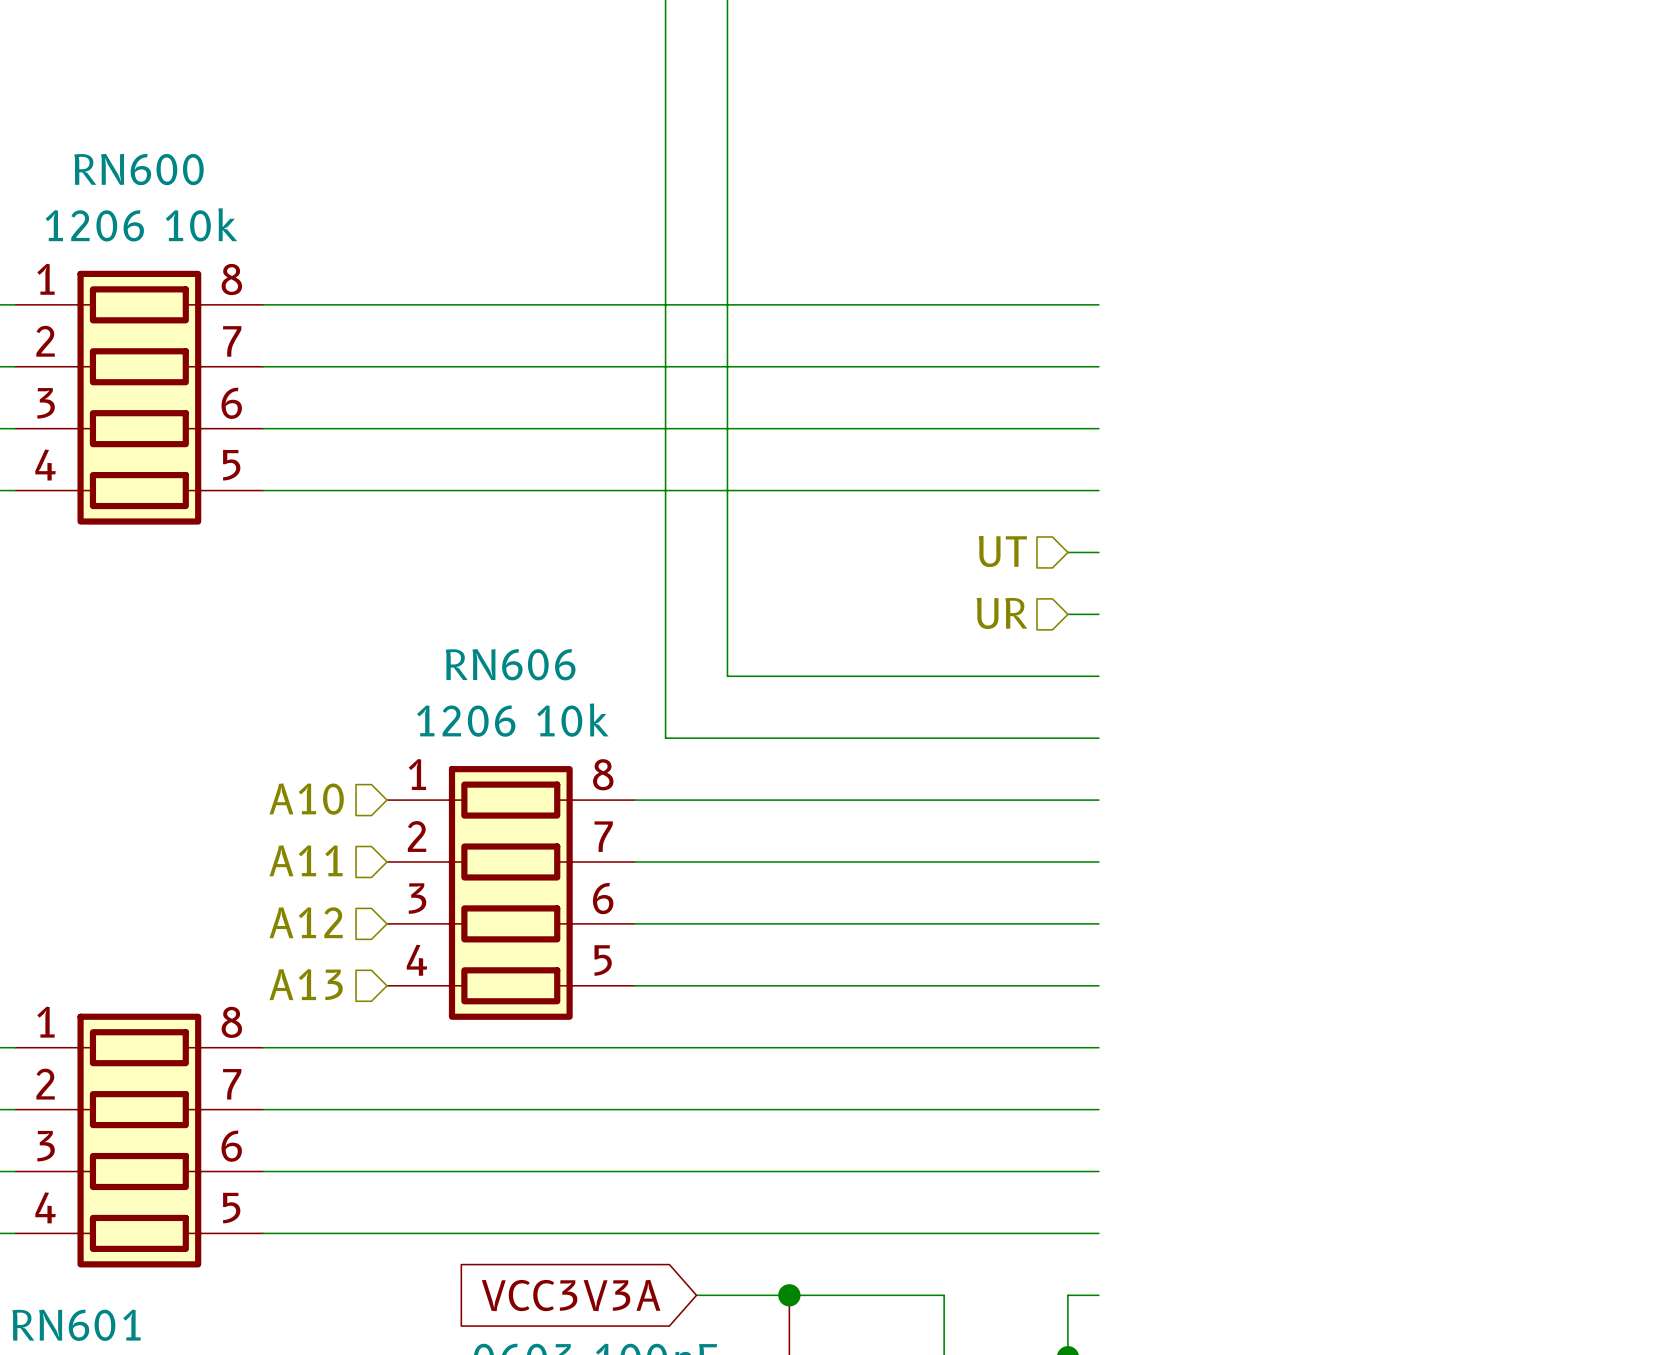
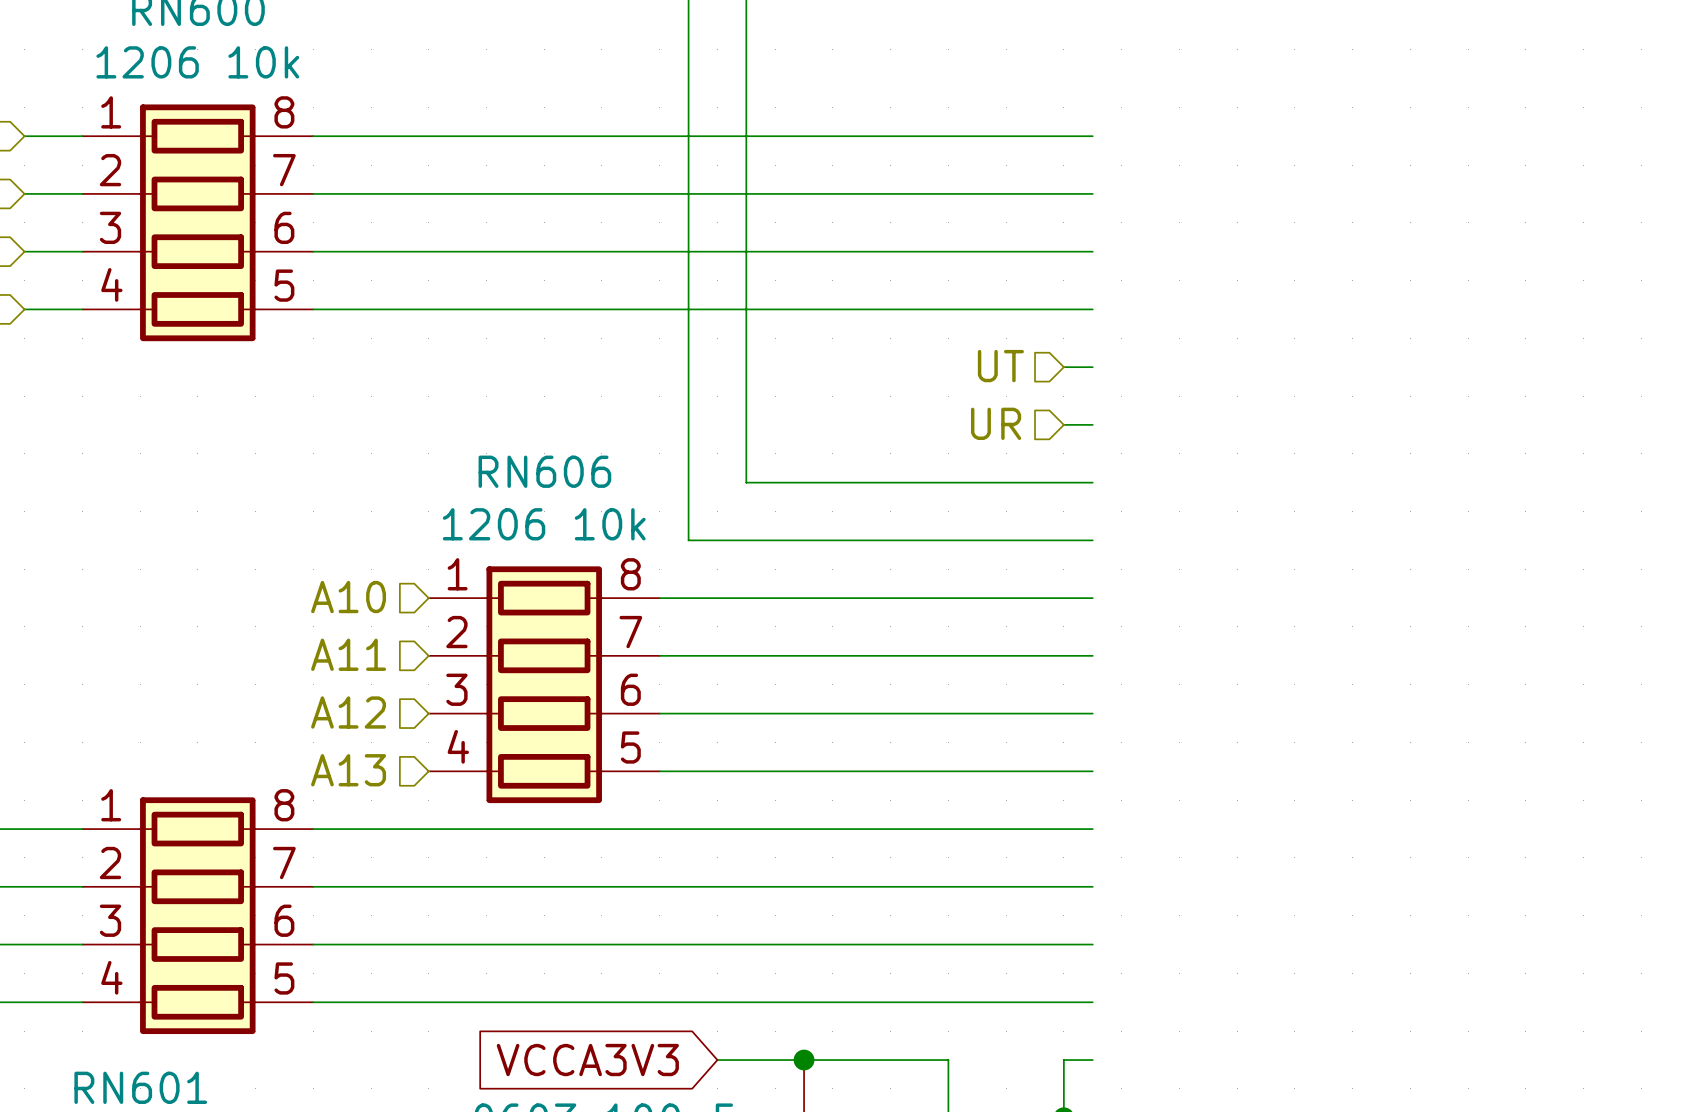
global label: VCC3V3A (571, 1295) -> VCCA3V3 (587, 1060)

